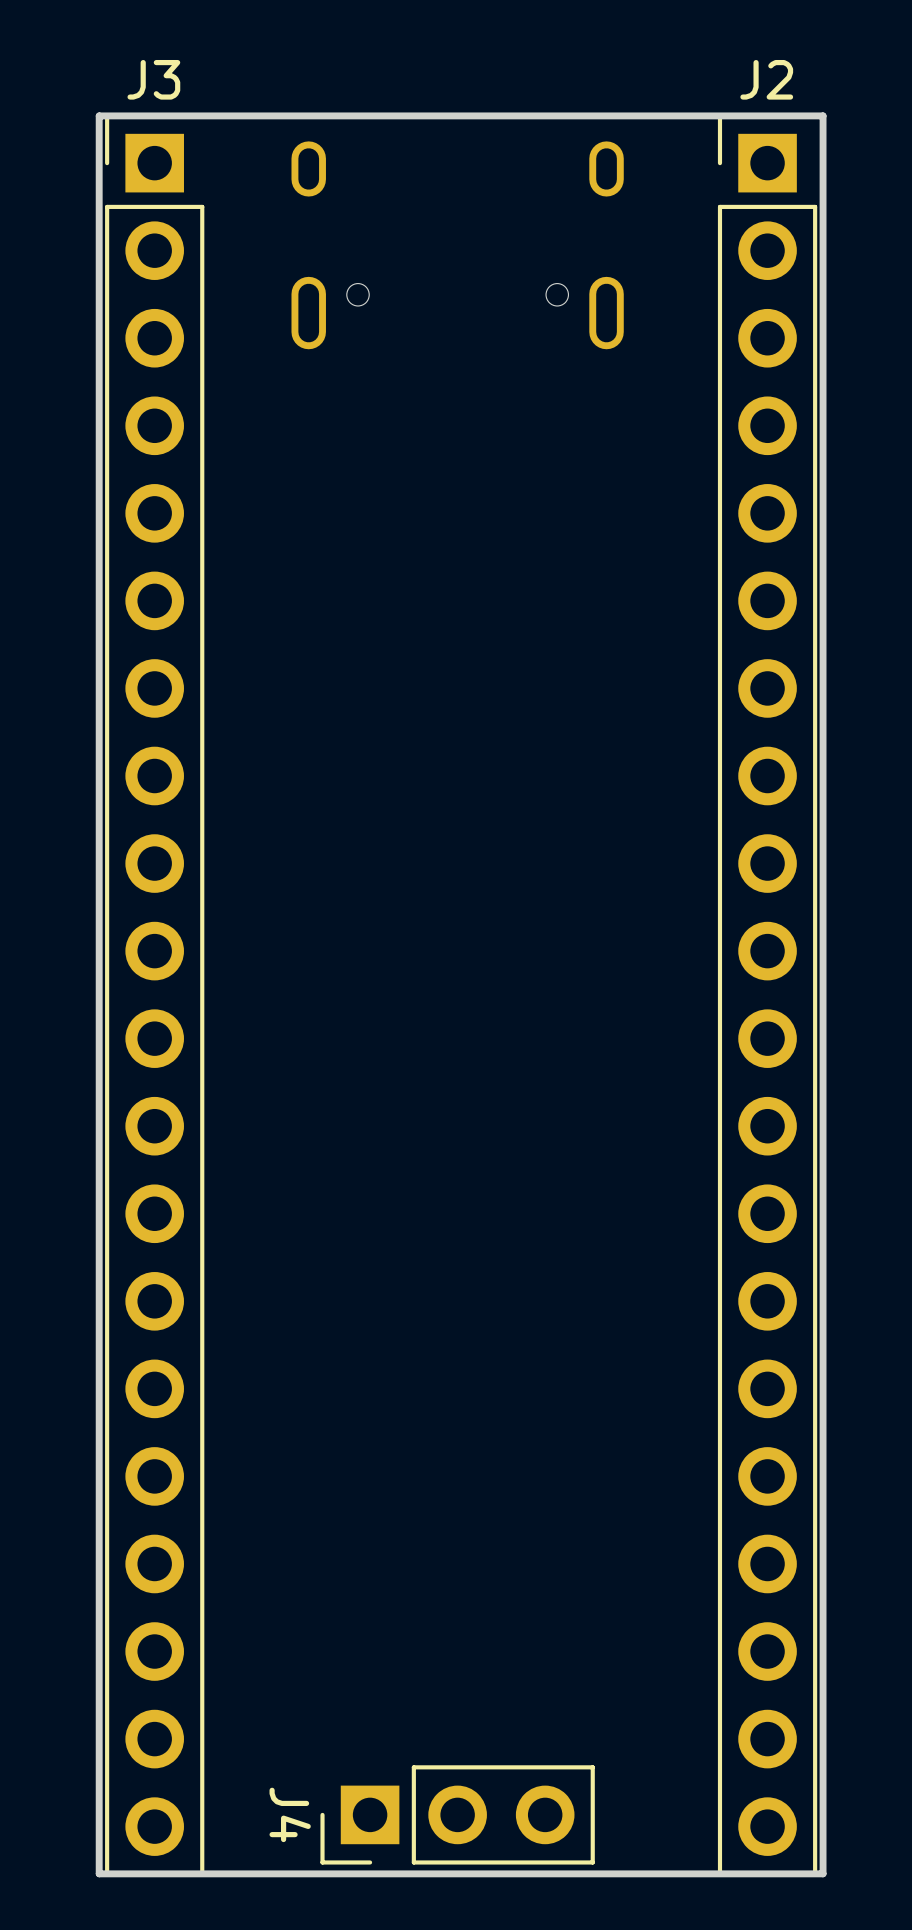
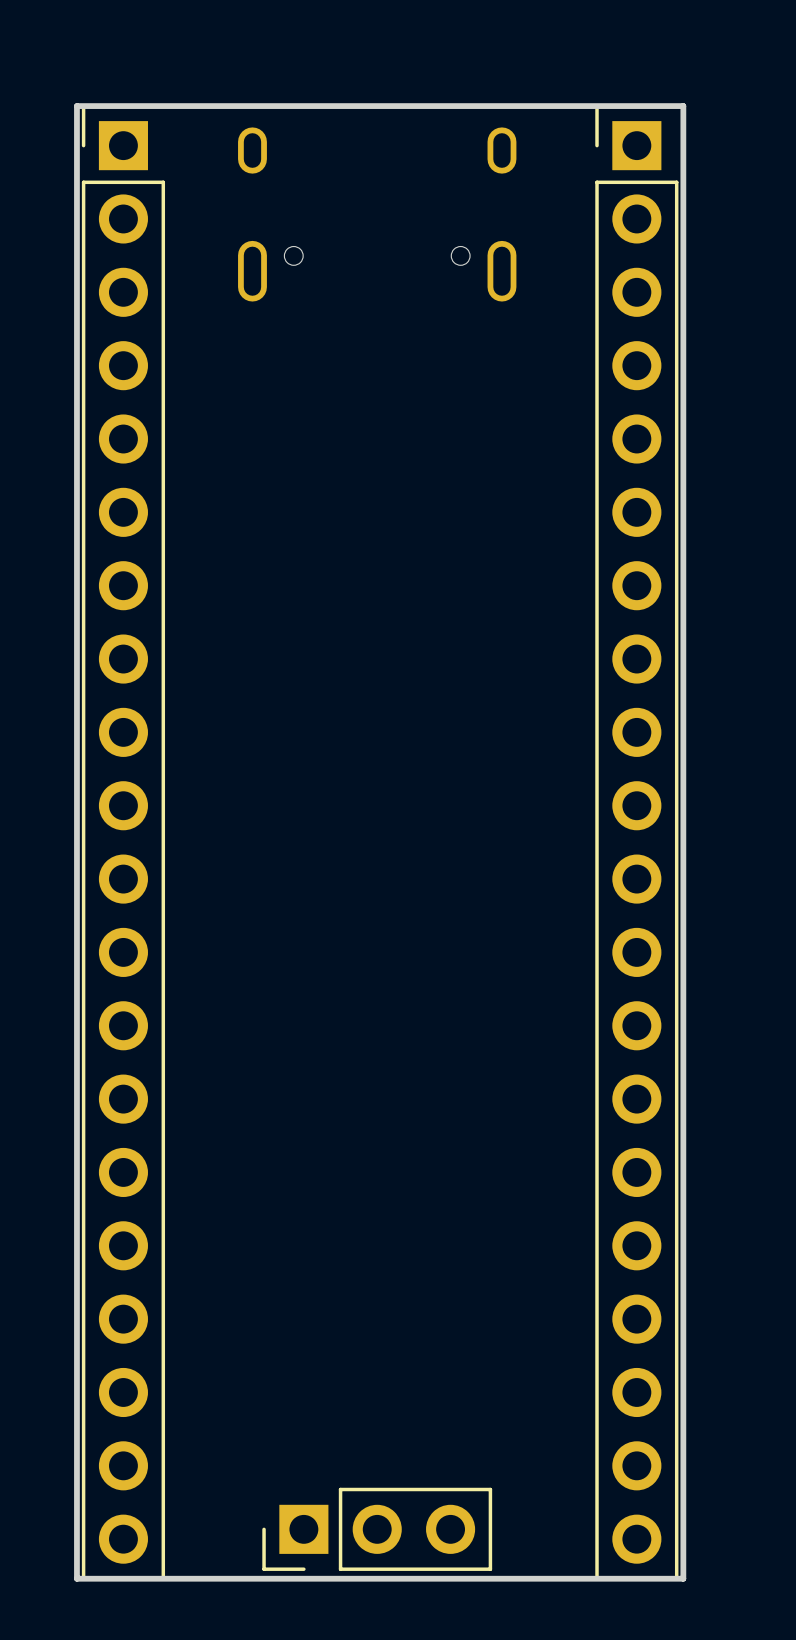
J3 name: J3 (153, 79) -> none
J2 name: J2 (766, 79) -> none
J4 name: J4 (290, 1814) -> none

